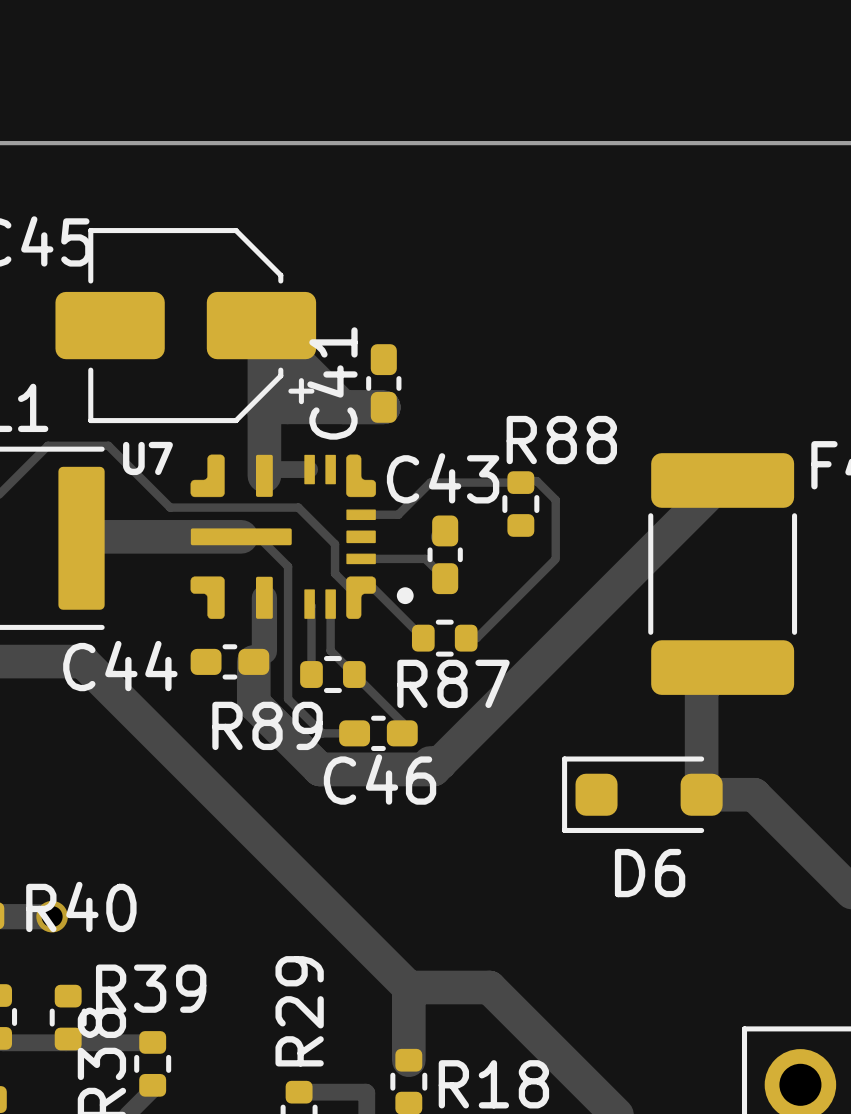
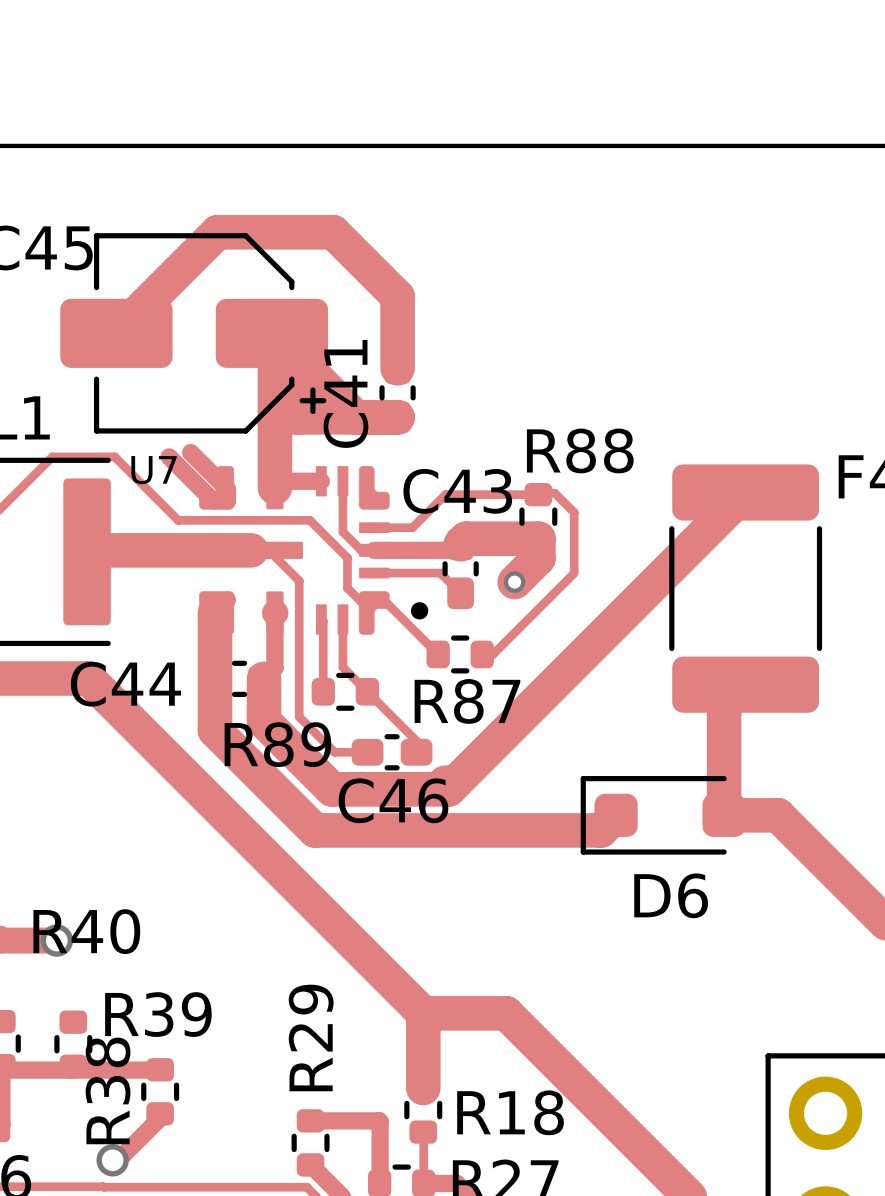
track: none -> (116, 333) (217, 232) (333, 232) (397, 296) (397, 368)
track: none -> (190, 452) (227, 489) (227, 500) (212, 500) (169, 456)
track: none -> (342, 481) (342, 532) (361, 550) (454, 550)
track: none -> (460, 544) (466, 538) (538, 538) (538, 558) (514, 582)
via: none -> (514, 582)
track: none -> (227, 600) (215, 612) (215, 730) (314, 830) (600, 830) (616, 815)
track width: thick (264, 597) (264, 651) -> thin (274, 612) (274, 667)

